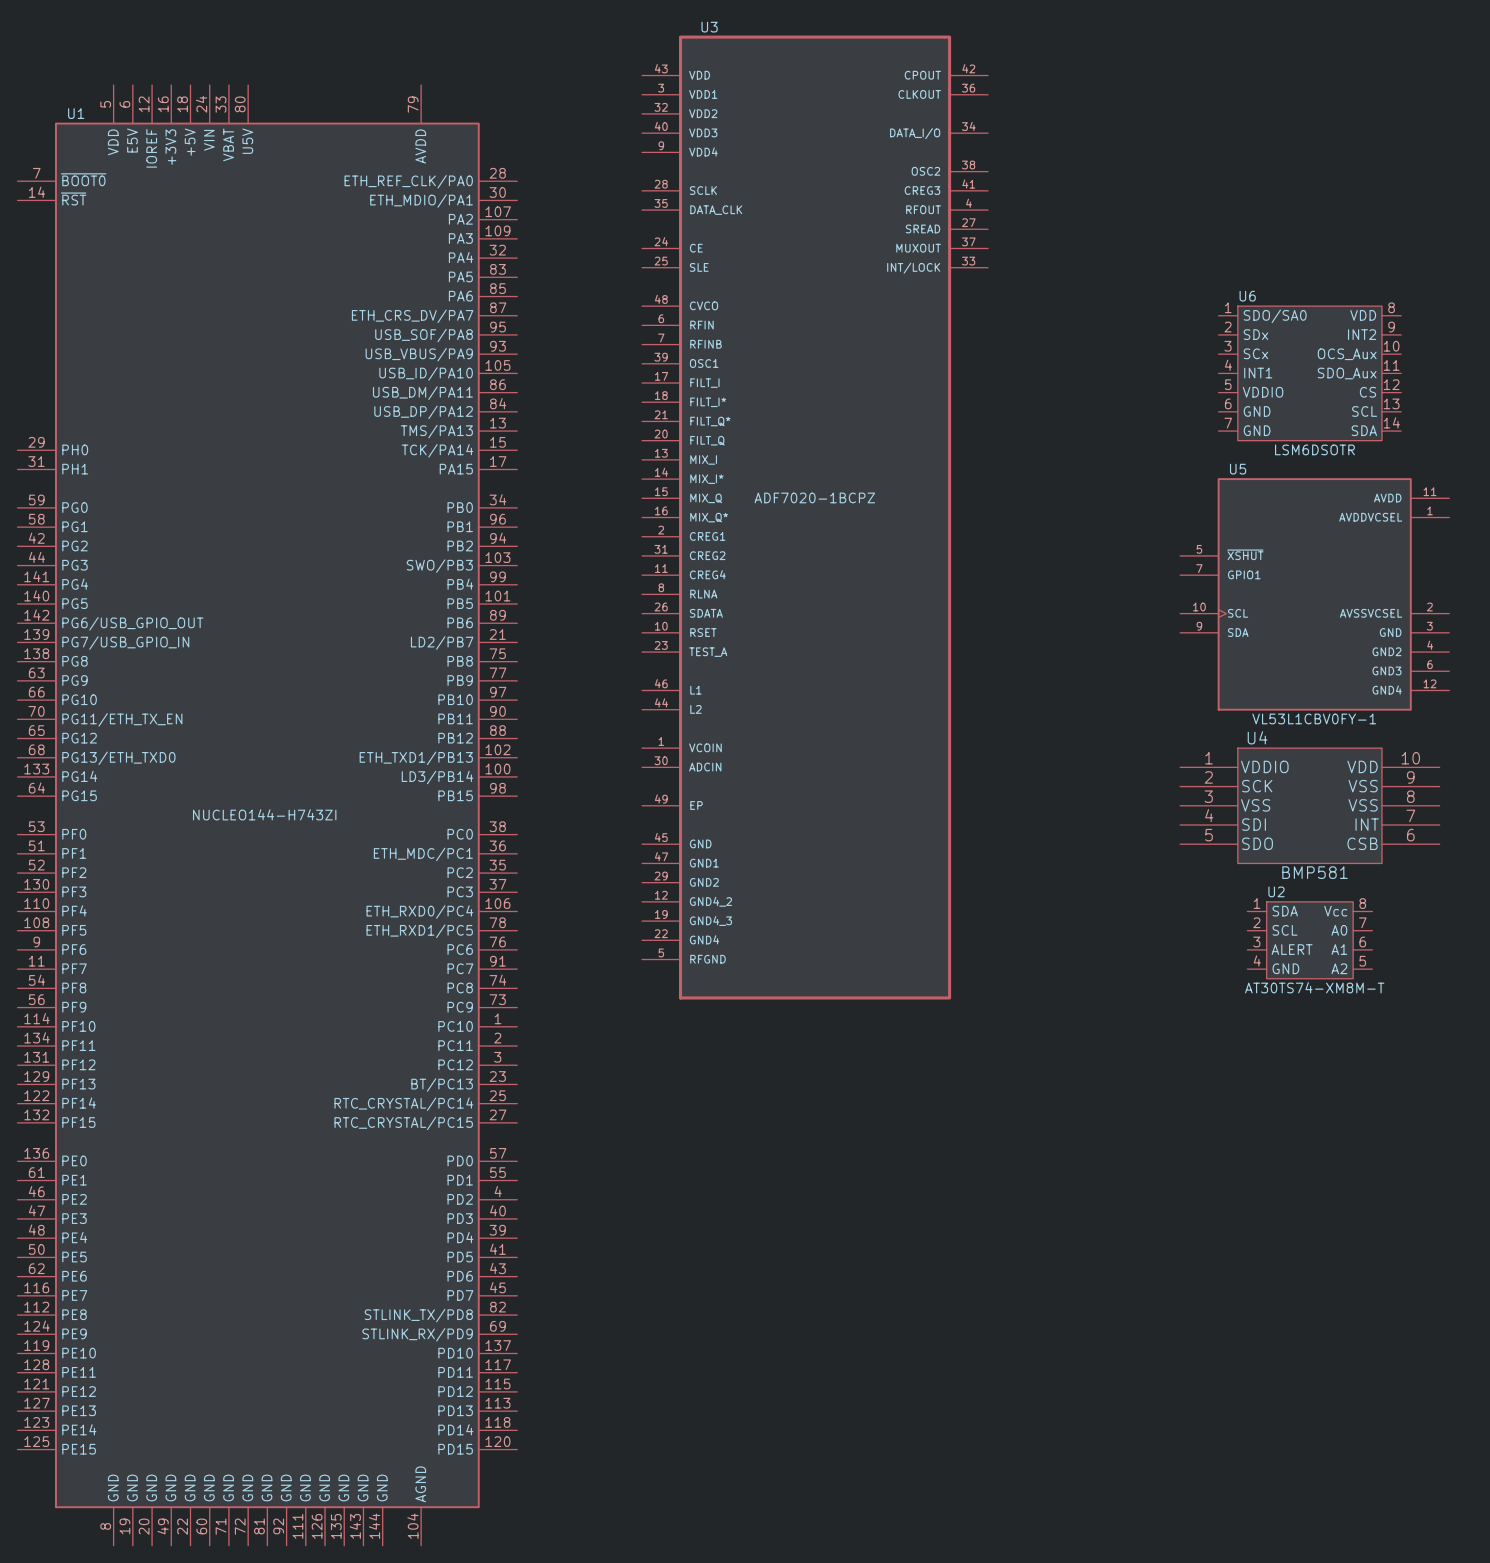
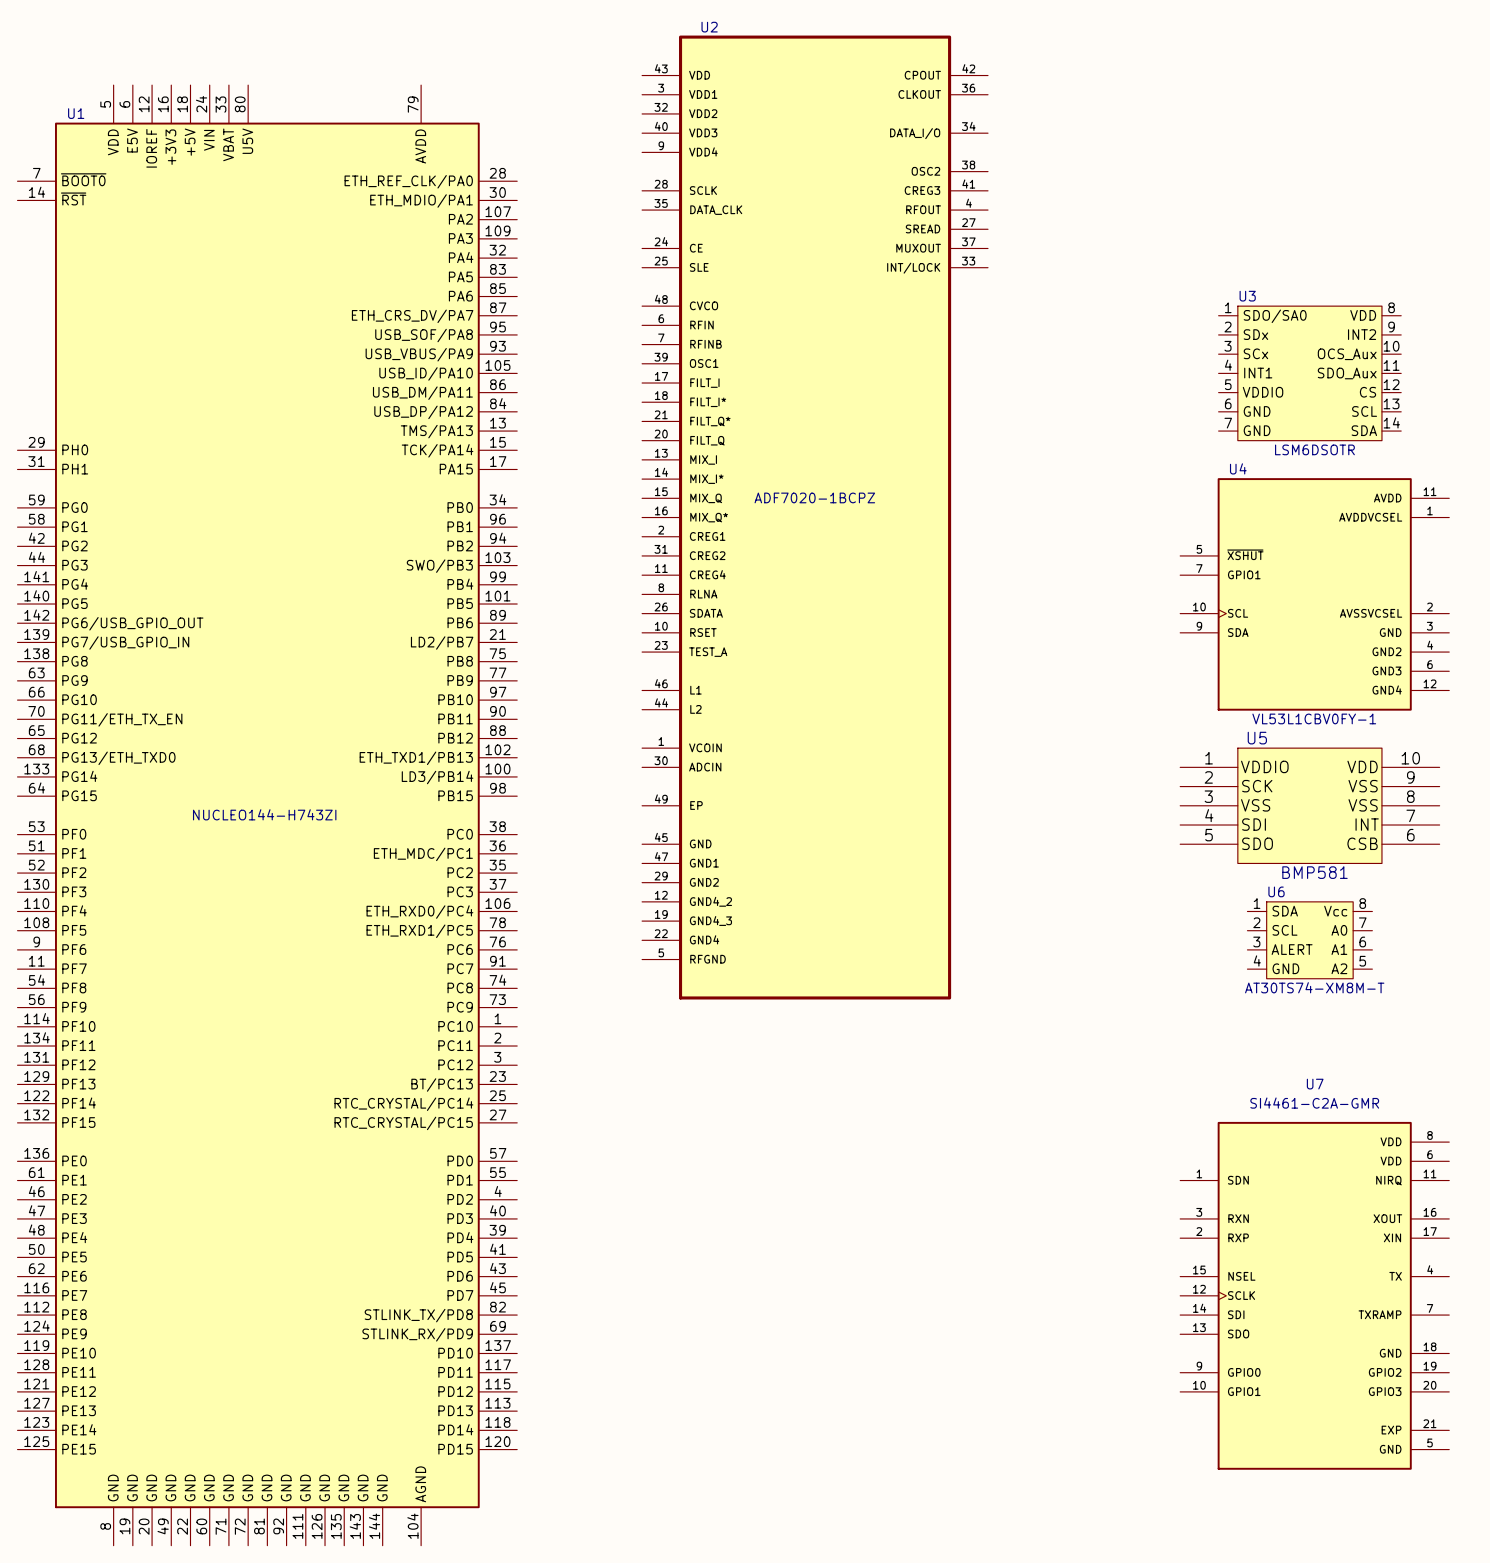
U3 name: U3 (709, 27) -> U2 (709, 27)
U6 name: U6 (1247, 296) -> U3 (1247, 296)
U5 name: U5 (1238, 469) -> U4 (1238, 468)
U4 name: U4 (1257, 737) -> U5 (1257, 738)
U2 name: U2 (1276, 891) -> U6 (1276, 891)
U7: none -> SI4461-C2A-GMR (1314, 1295)

